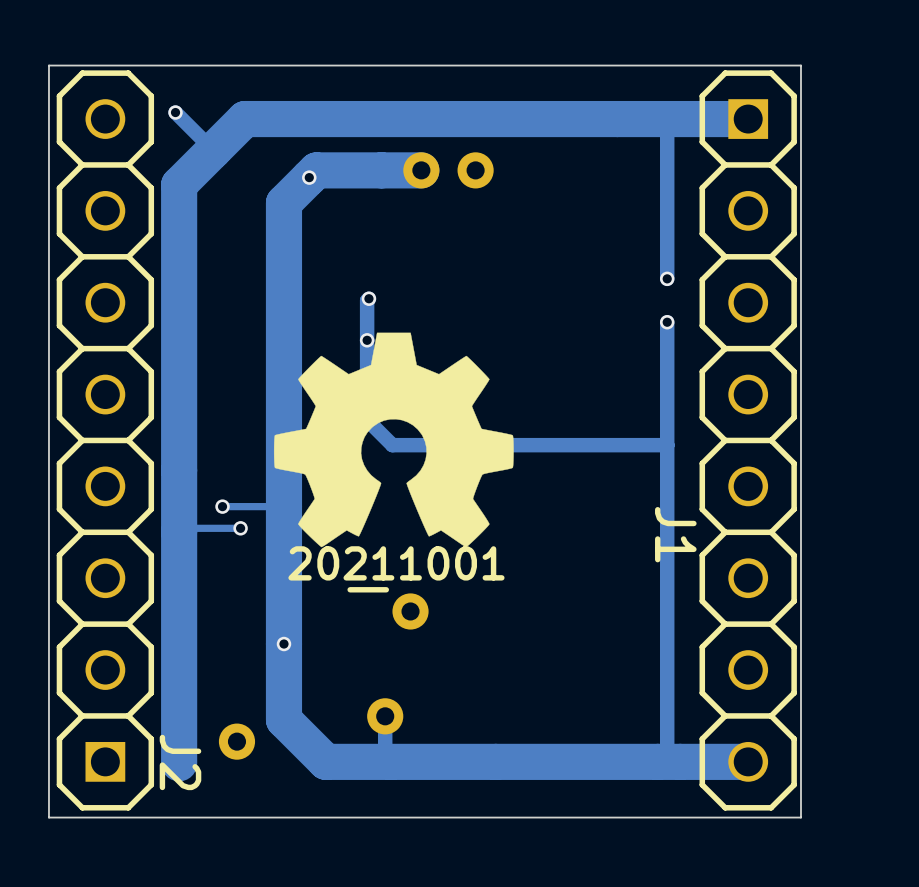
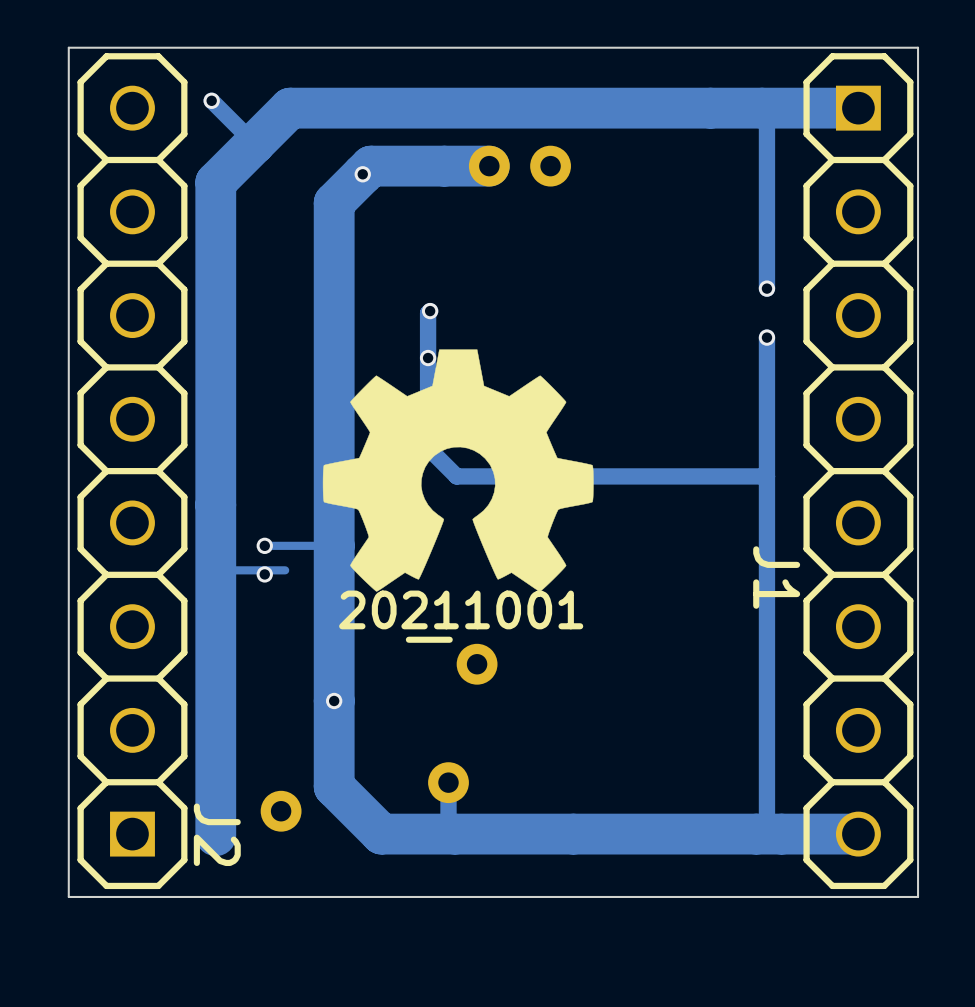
via position: (240, 528) -> (264, 574)

